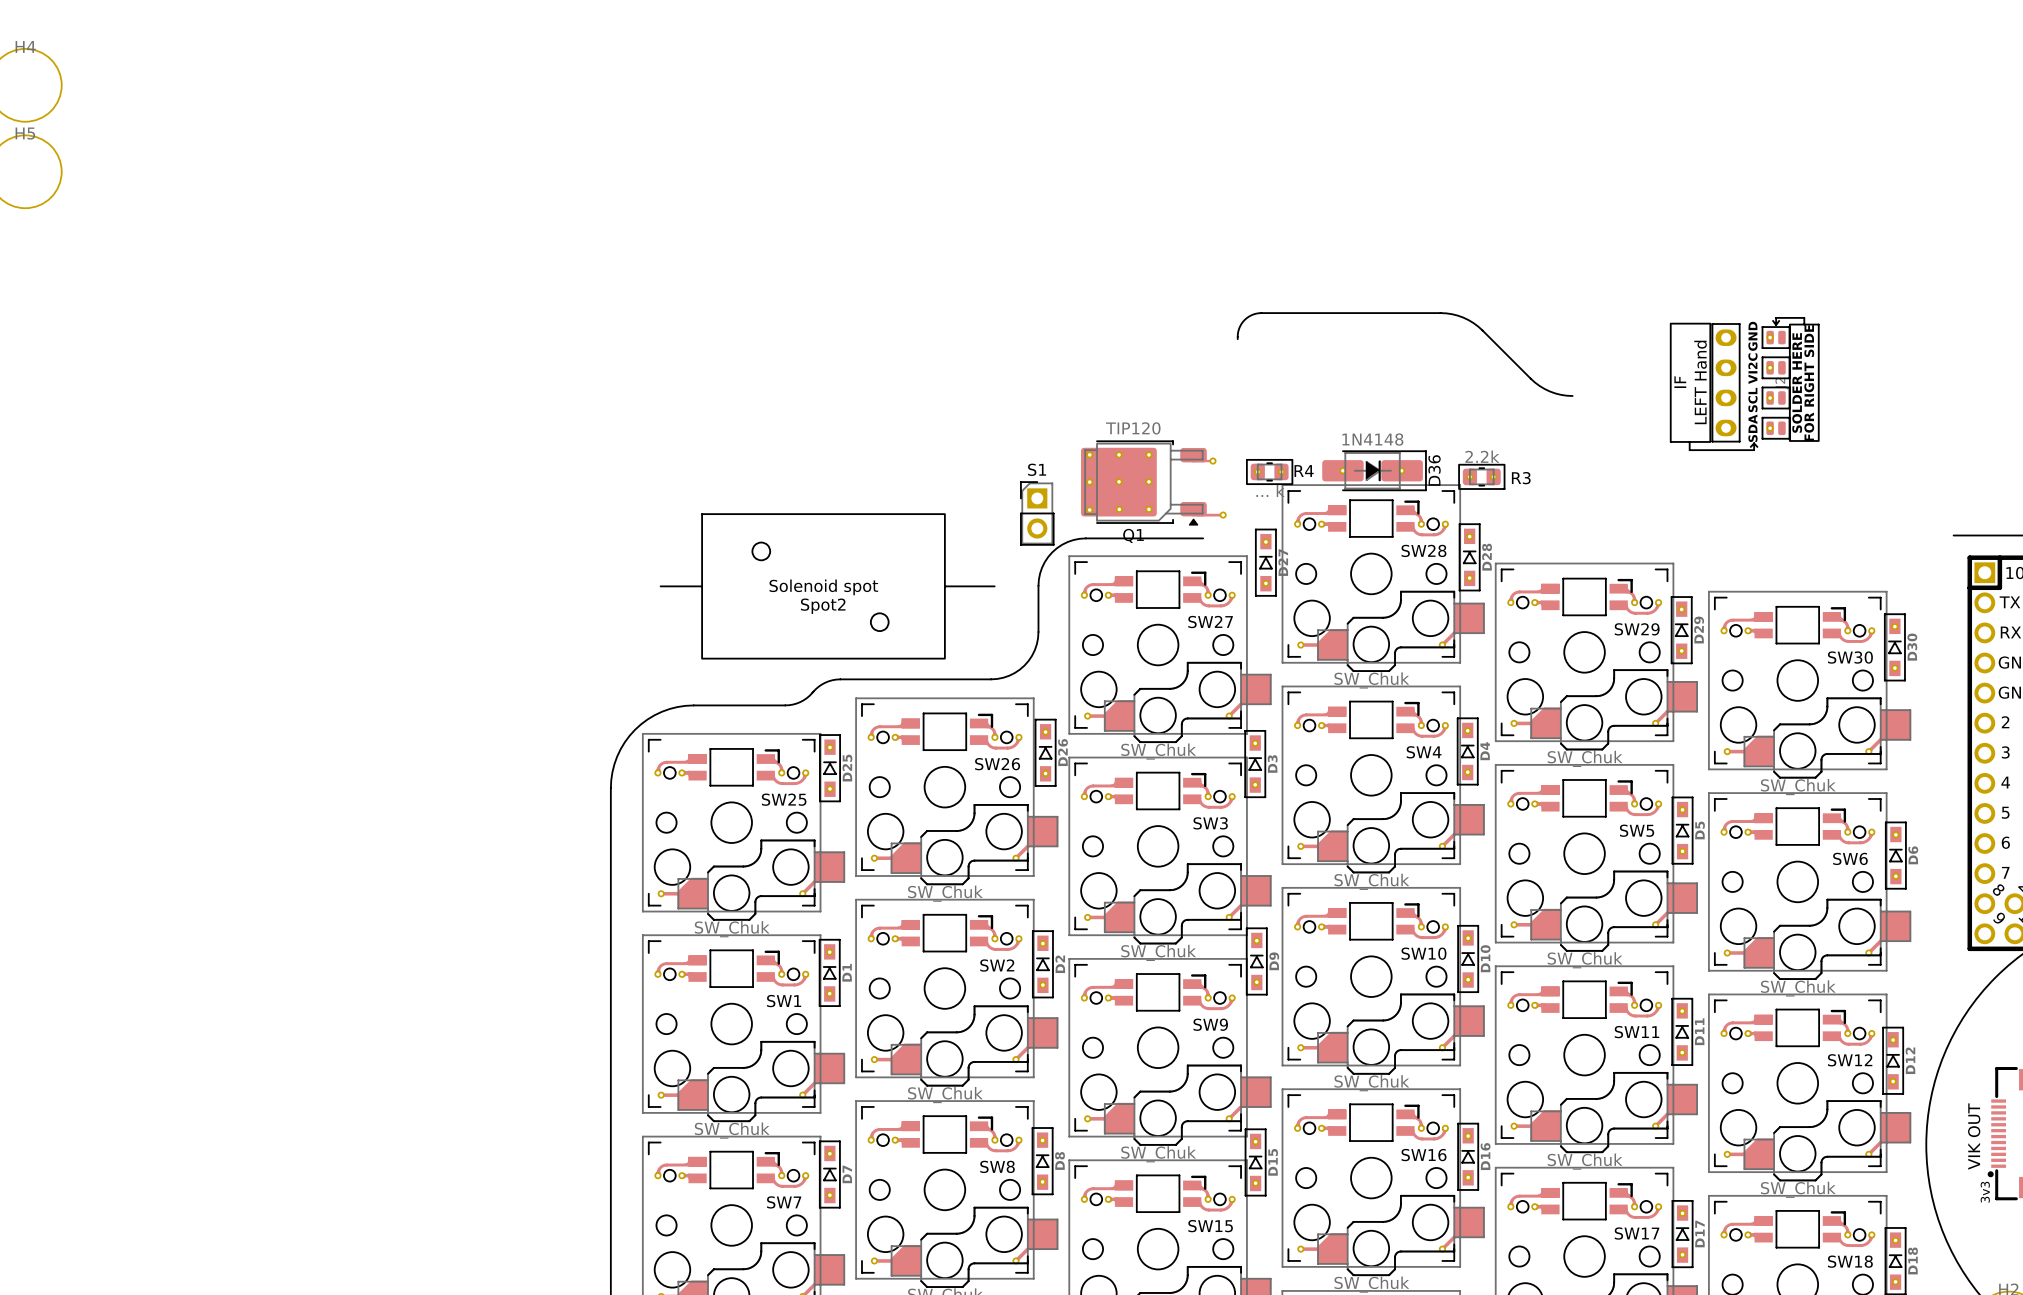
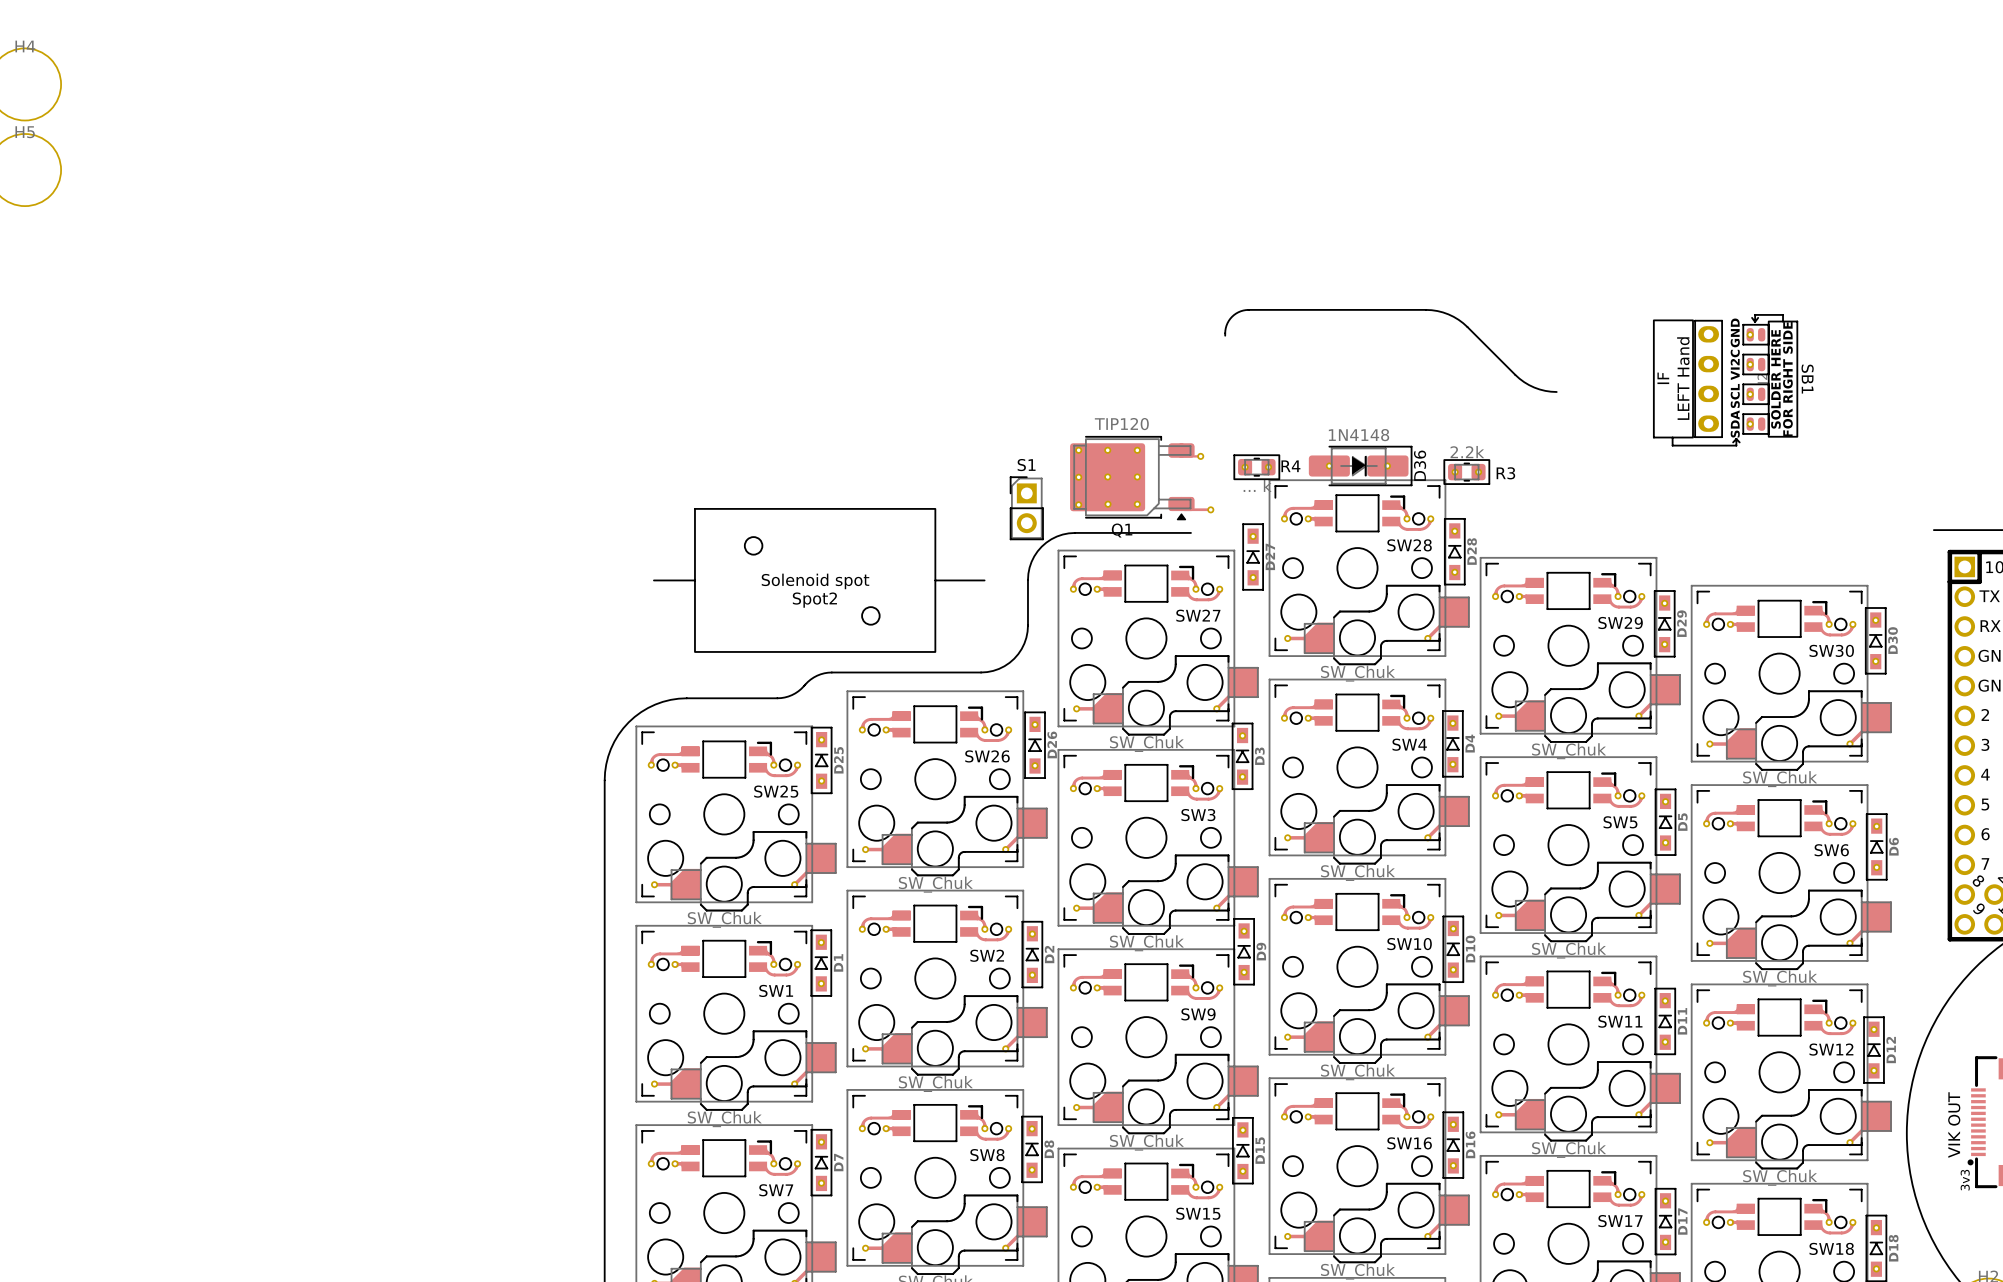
SB1: none -> (1770, 375)
part: (1790, 379) -> none

